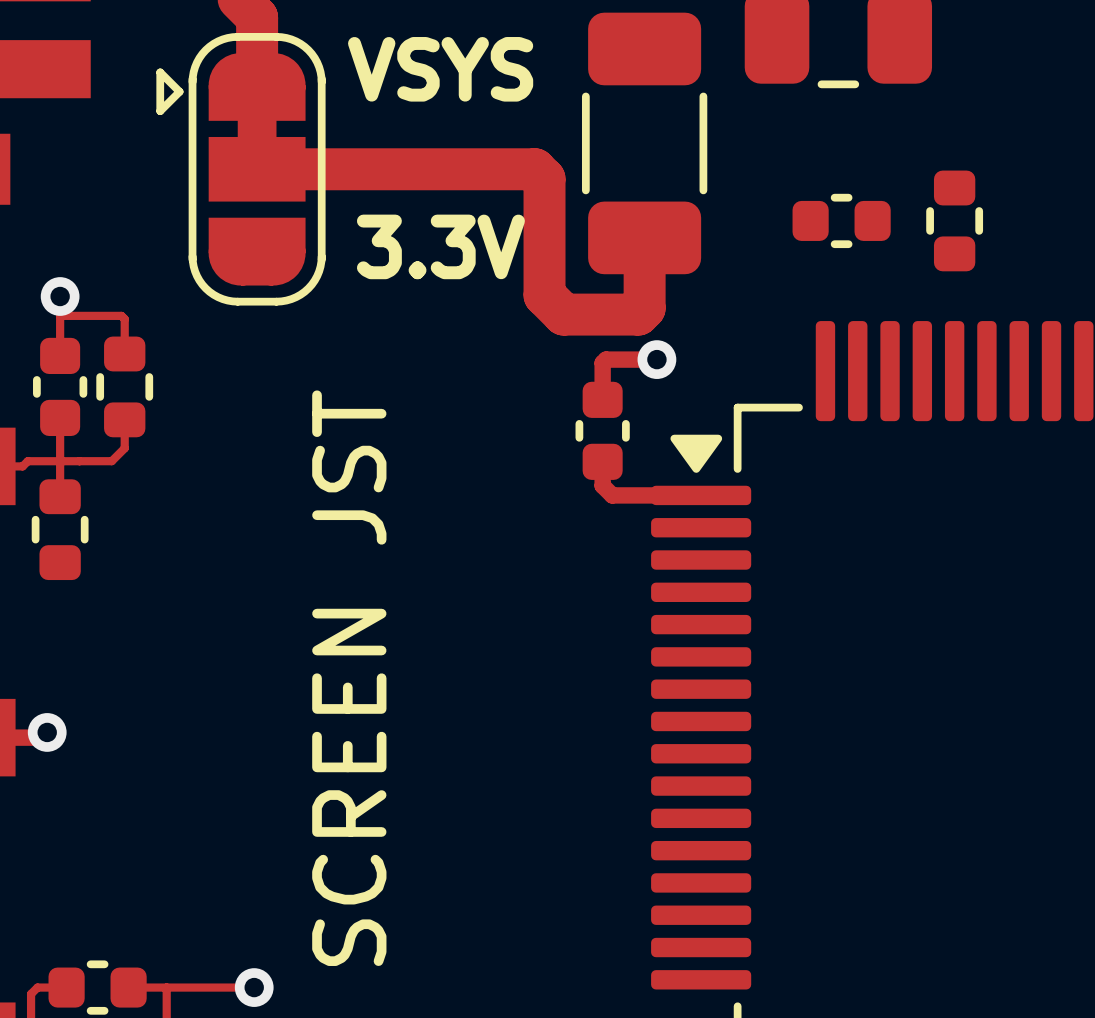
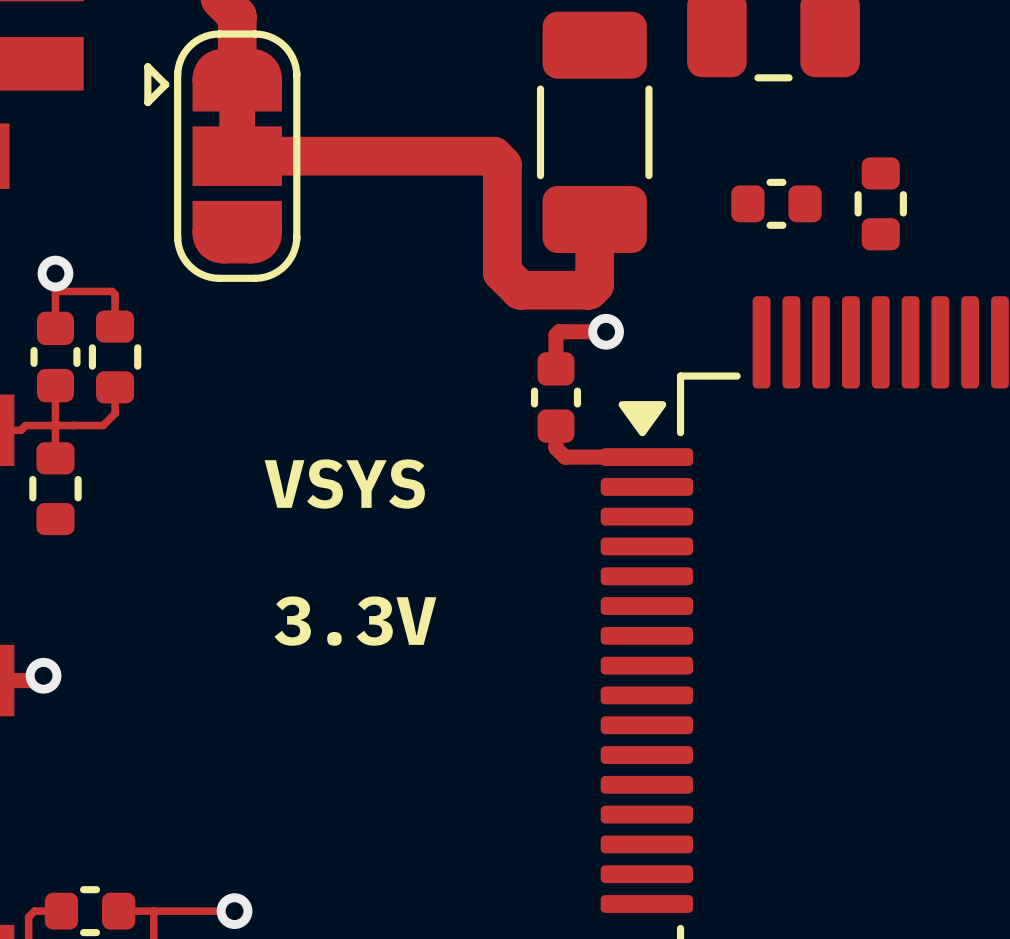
text position: VSYS (440, 69) -> VSYS (344, 484)
text position: 3.3V (440, 246) -> 3.3V (355, 621)
text: SCREEN JST (349, 678) -> none

